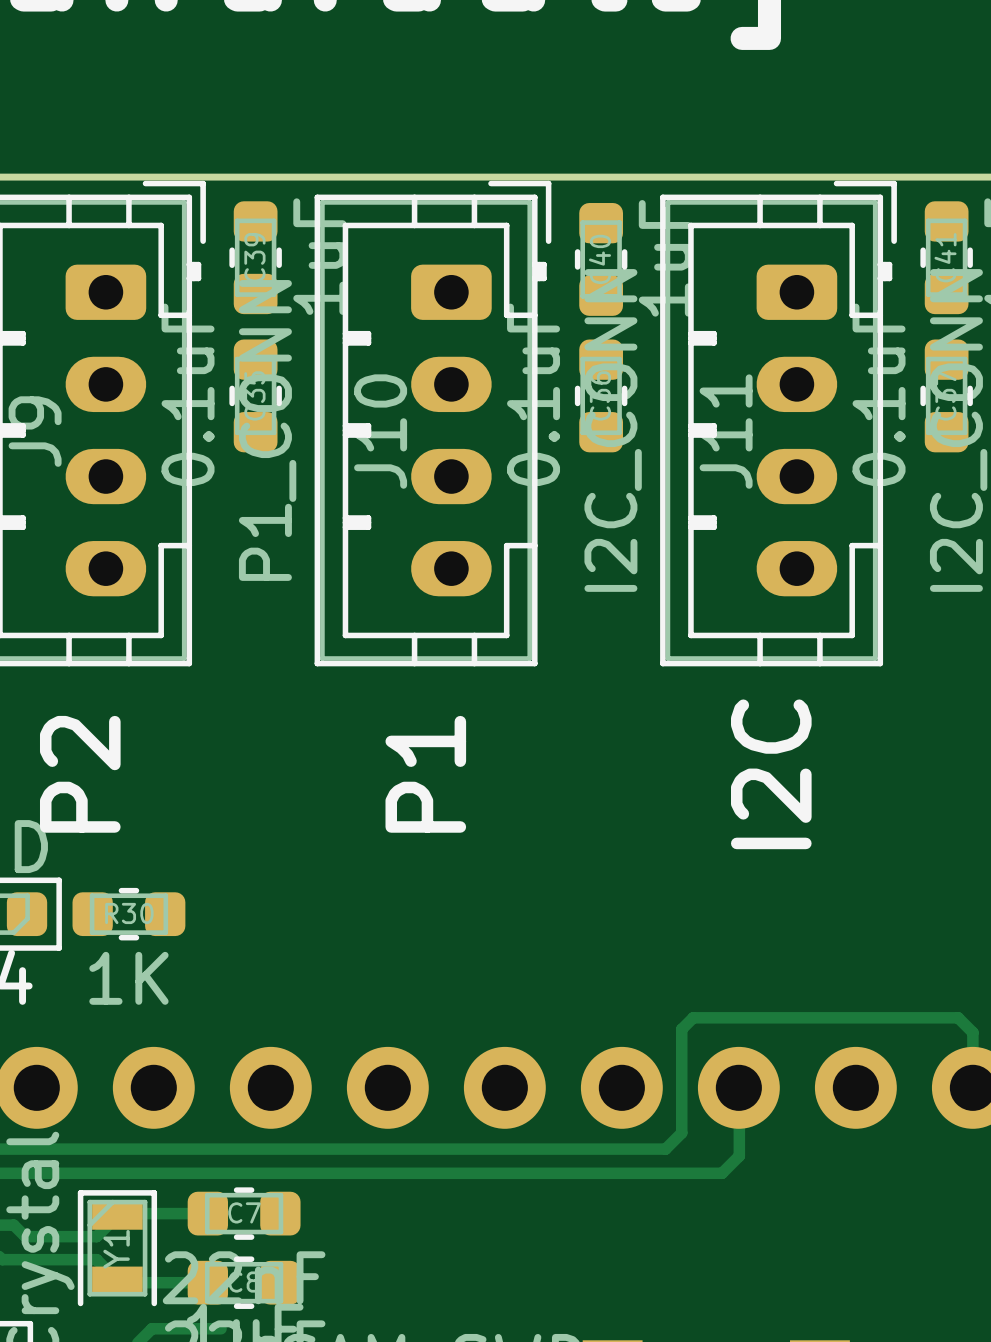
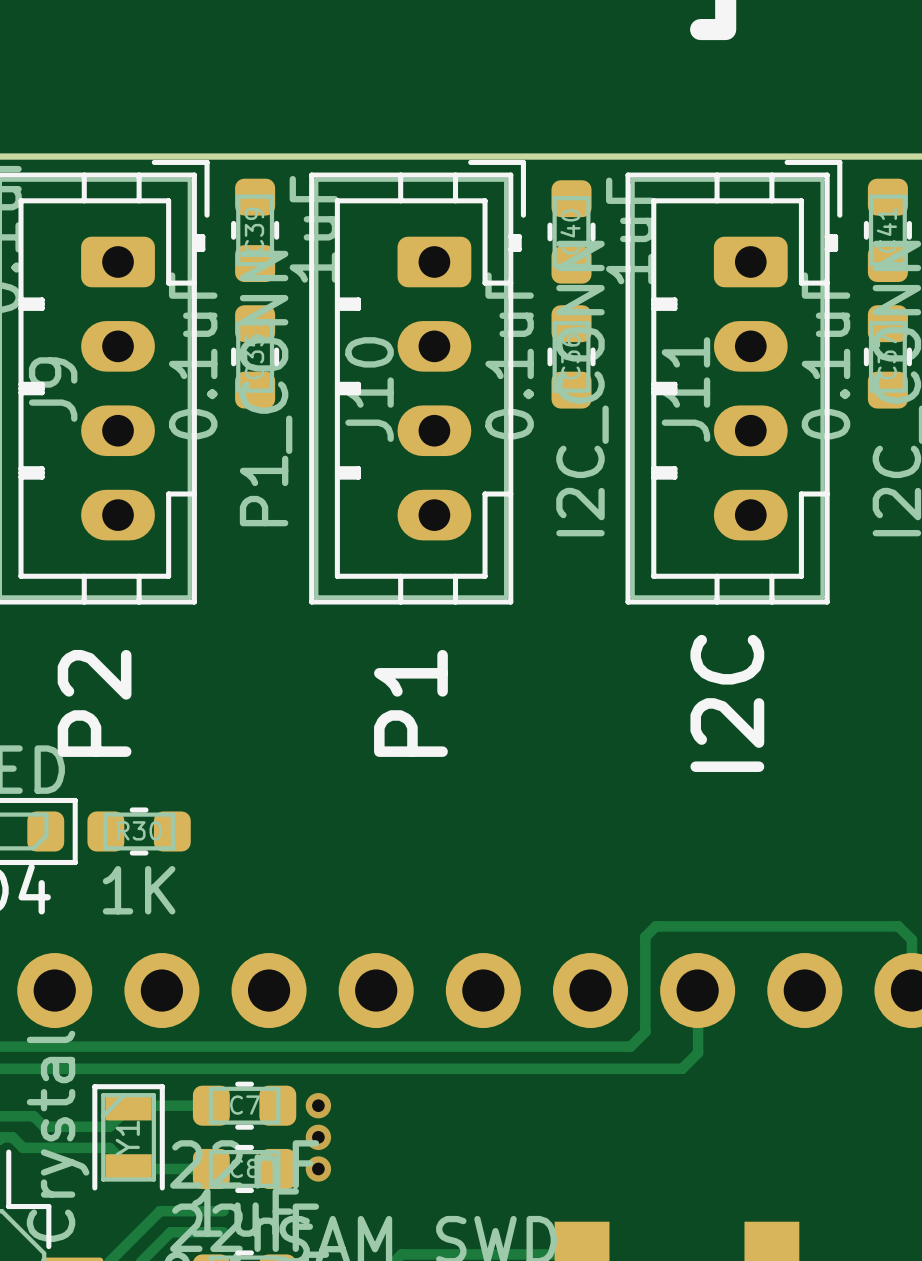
via: none -> (318, 1105)
via: none -> (318, 1137)
via: none -> (318, 1168)

